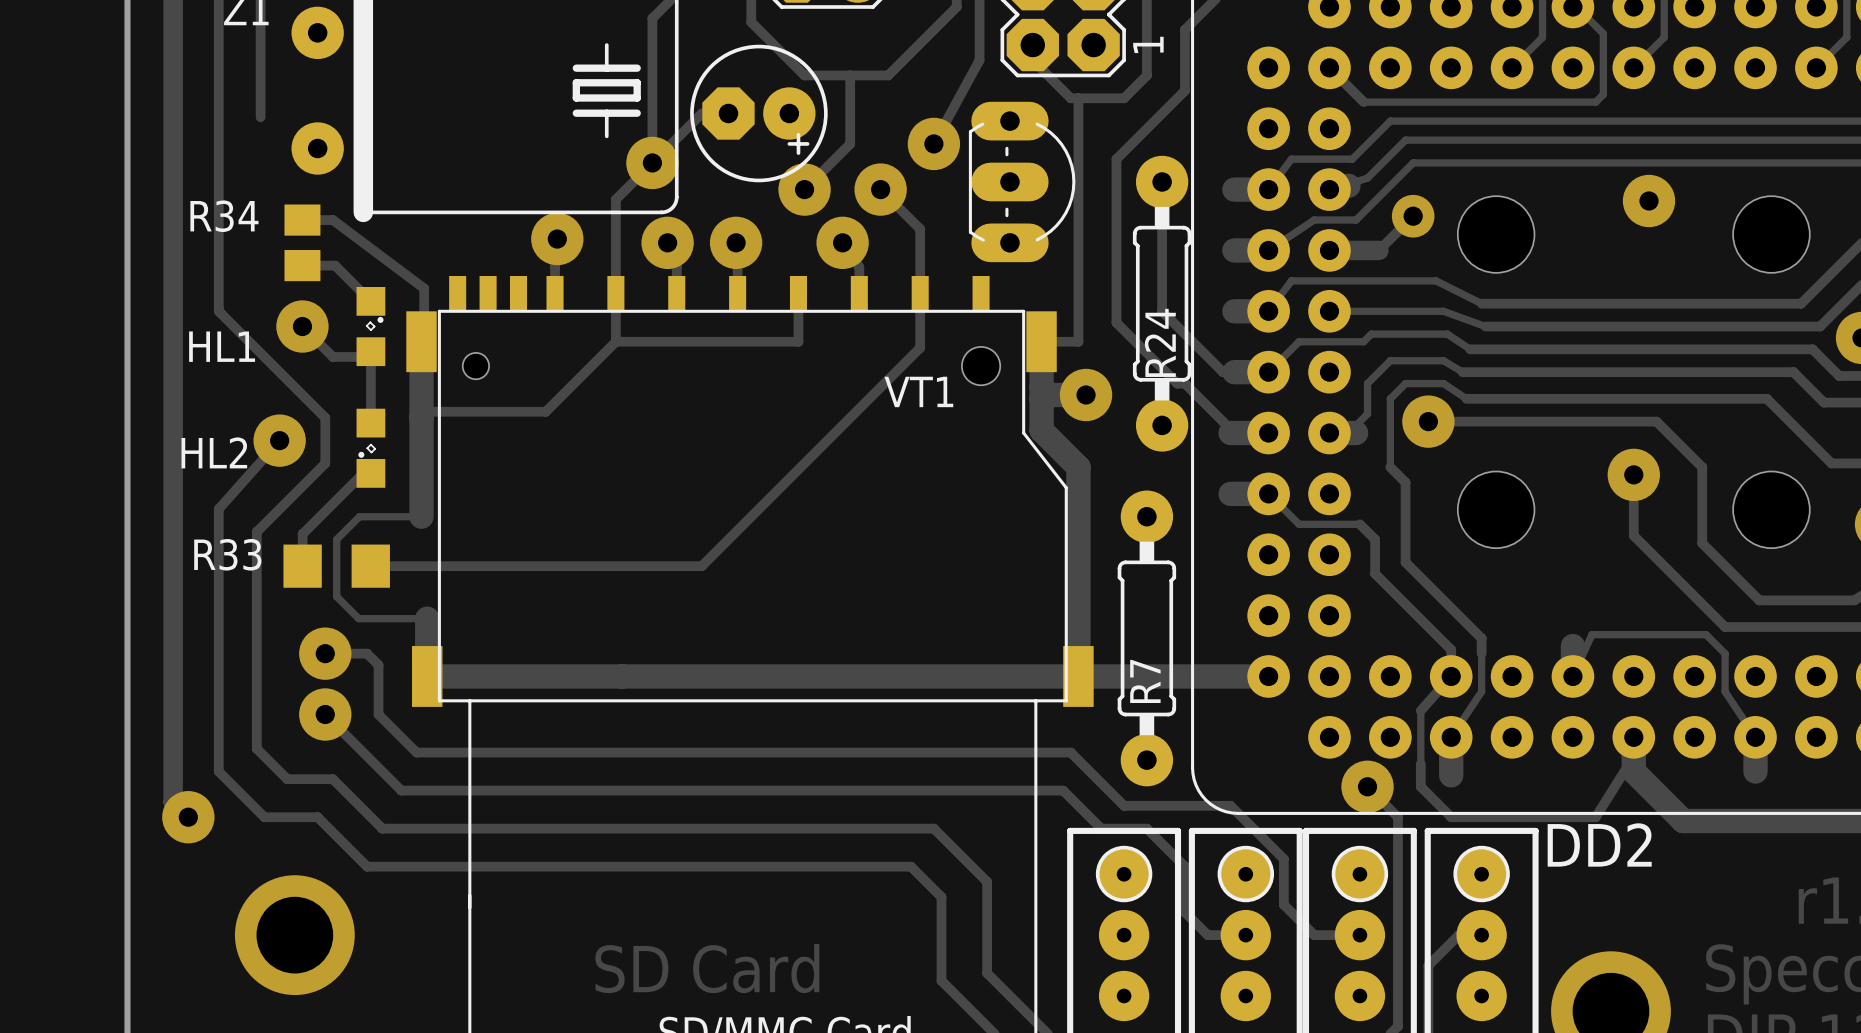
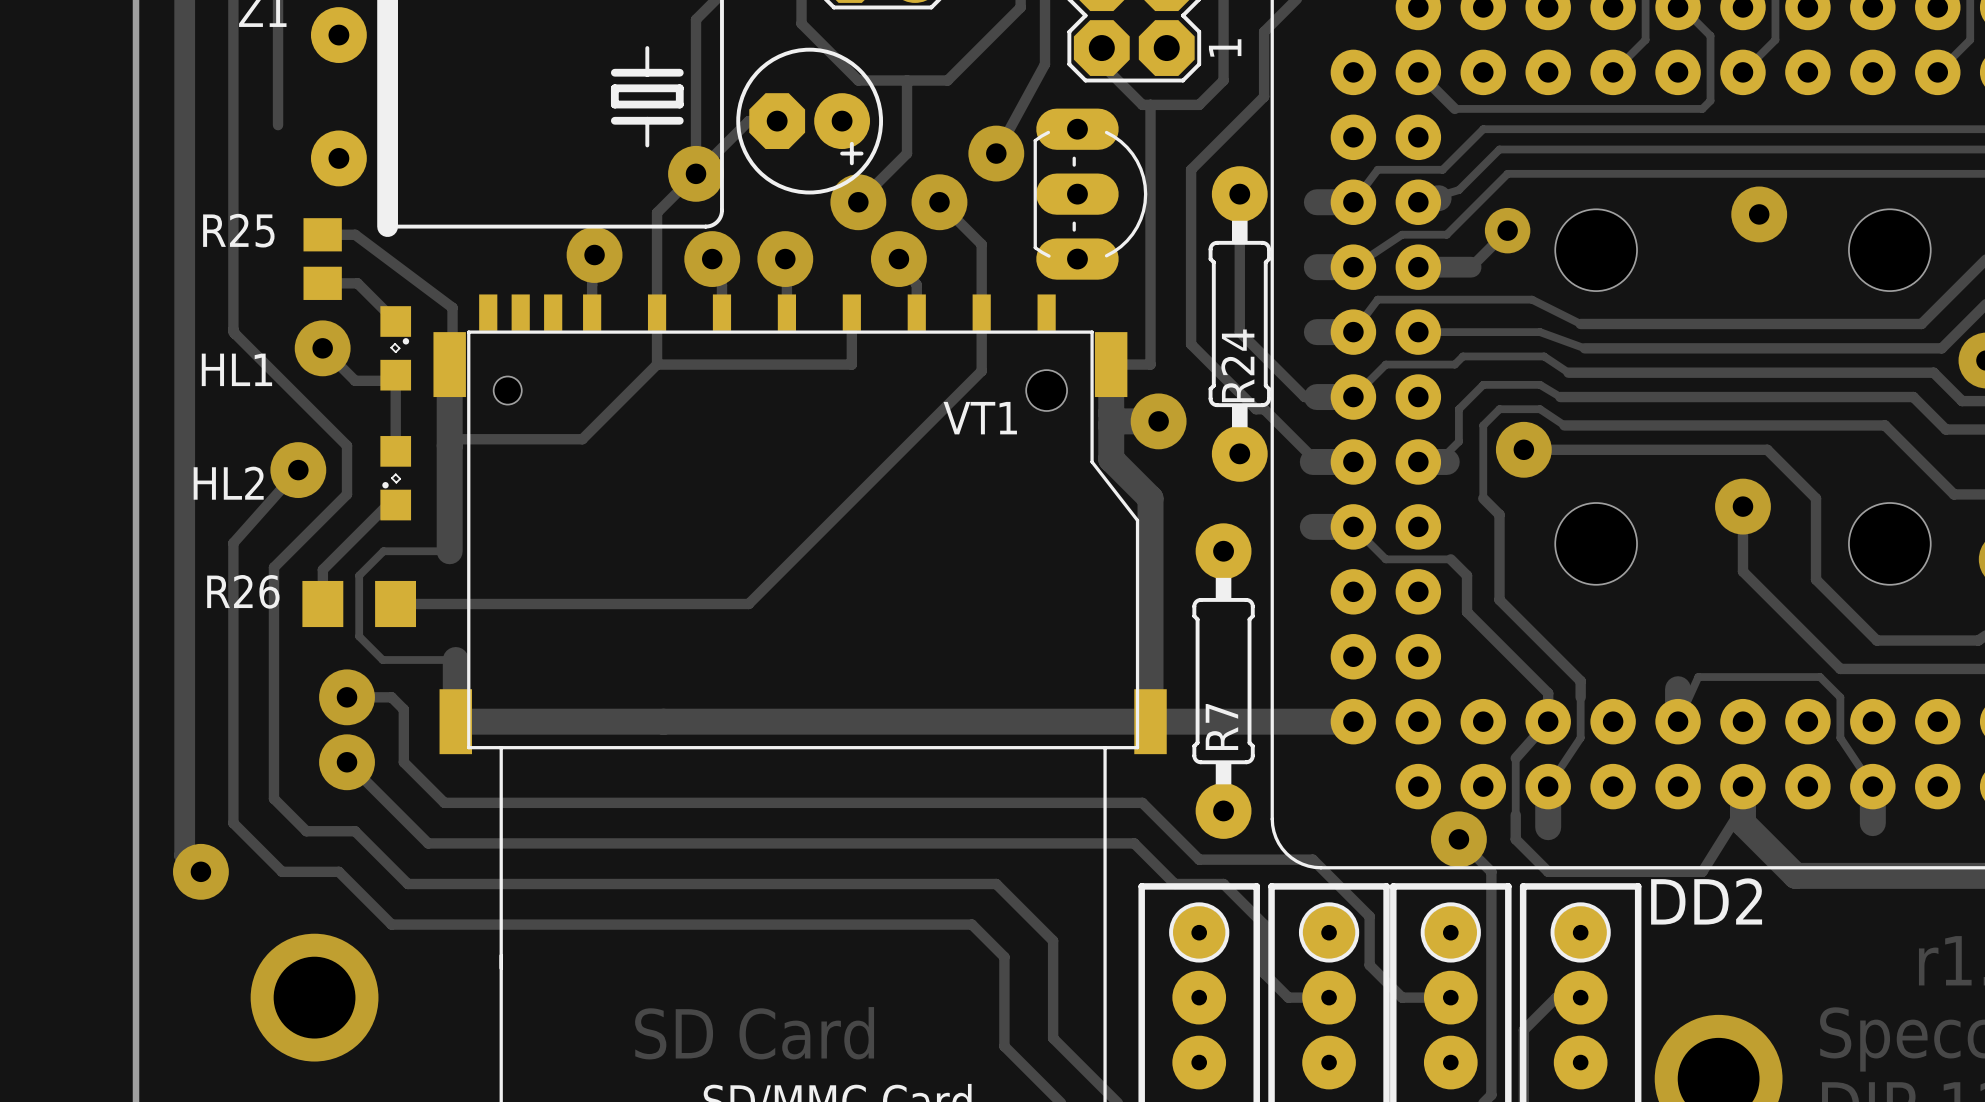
R34 name: R34 (224, 216) -> R25 (238, 230)
R33 name: R33 (227, 554) -> R26 (243, 591)

